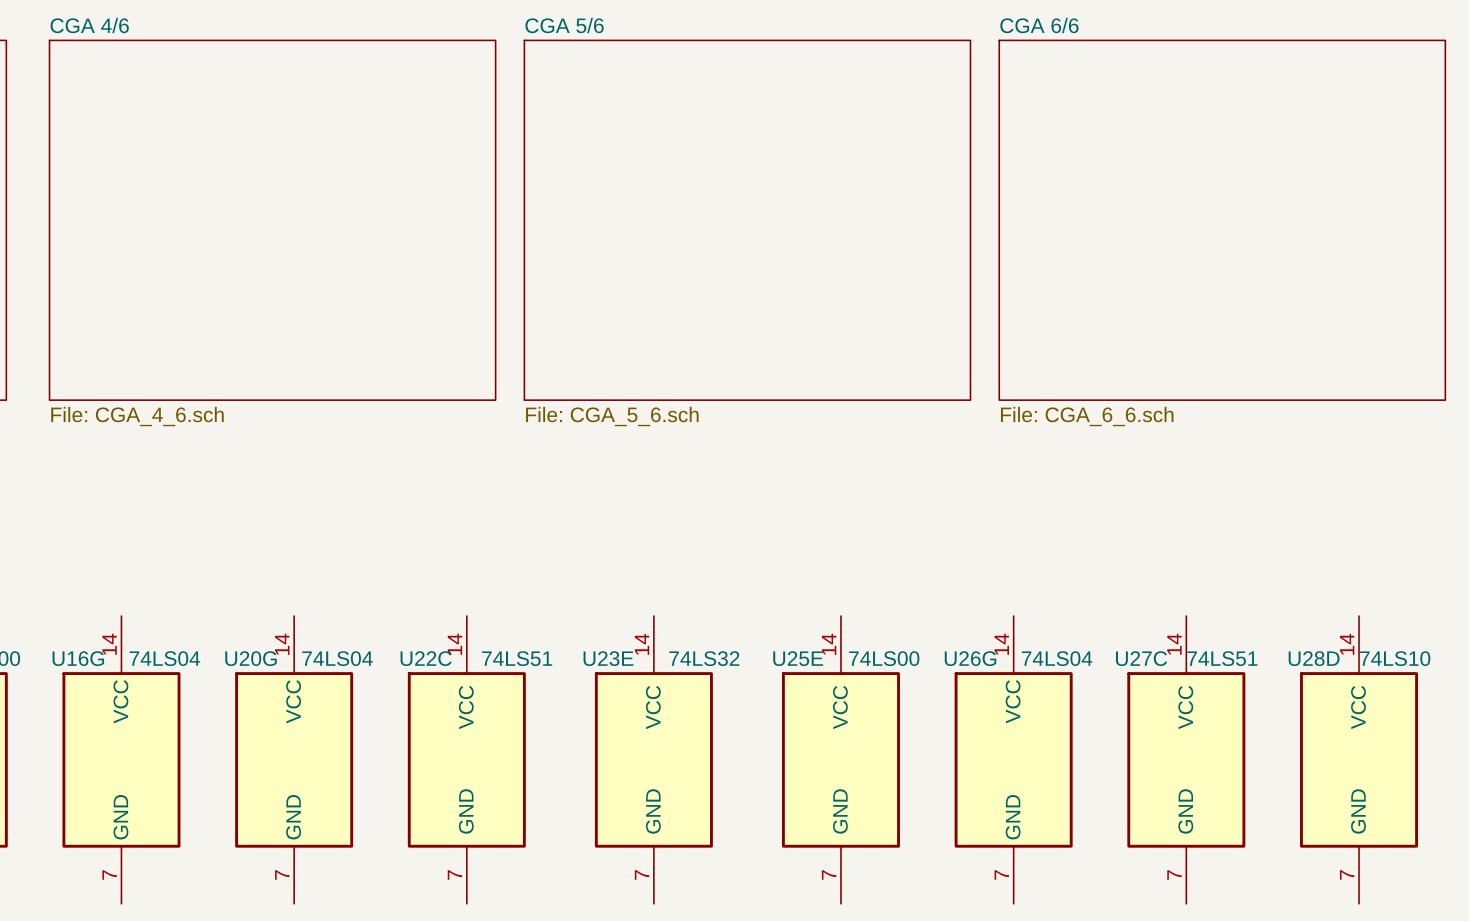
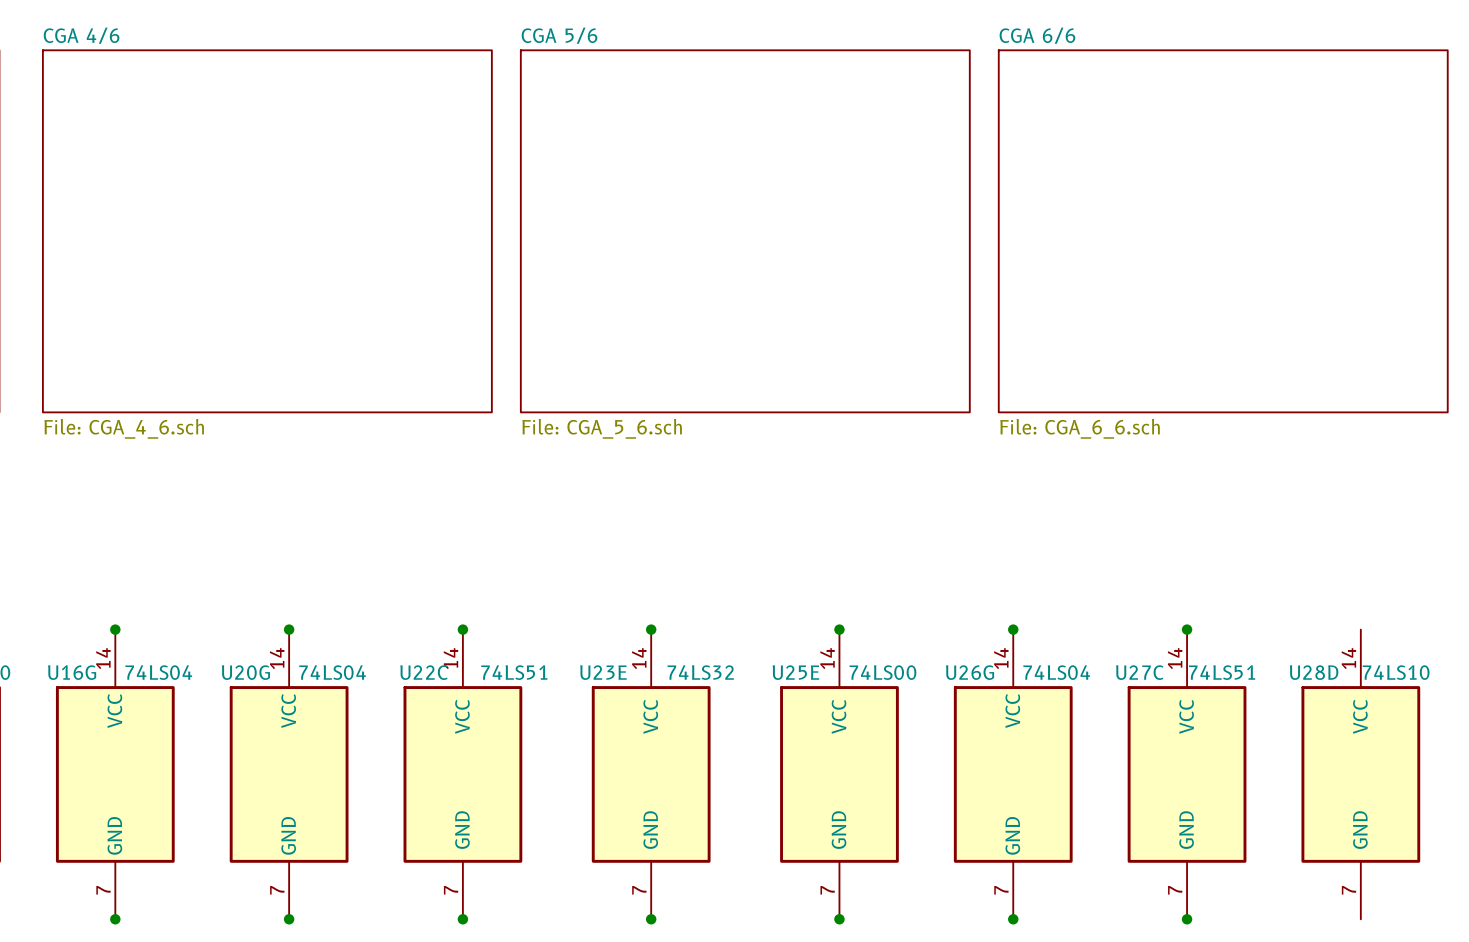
junction: none -> (115, 629)
junction: none -> (289, 629)
junction: none -> (462, 629)
junction: none -> (651, 629)
junction: none -> (839, 629)
junction: none -> (1013, 629)
junction: none -> (1187, 629)
junction: none -> (115, 919)
junction: none -> (289, 919)
junction: none -> (462, 919)
junction: none -> (651, 919)
junction: none -> (839, 919)
junction: none -> (1013, 919)
junction: none -> (1187, 919)

